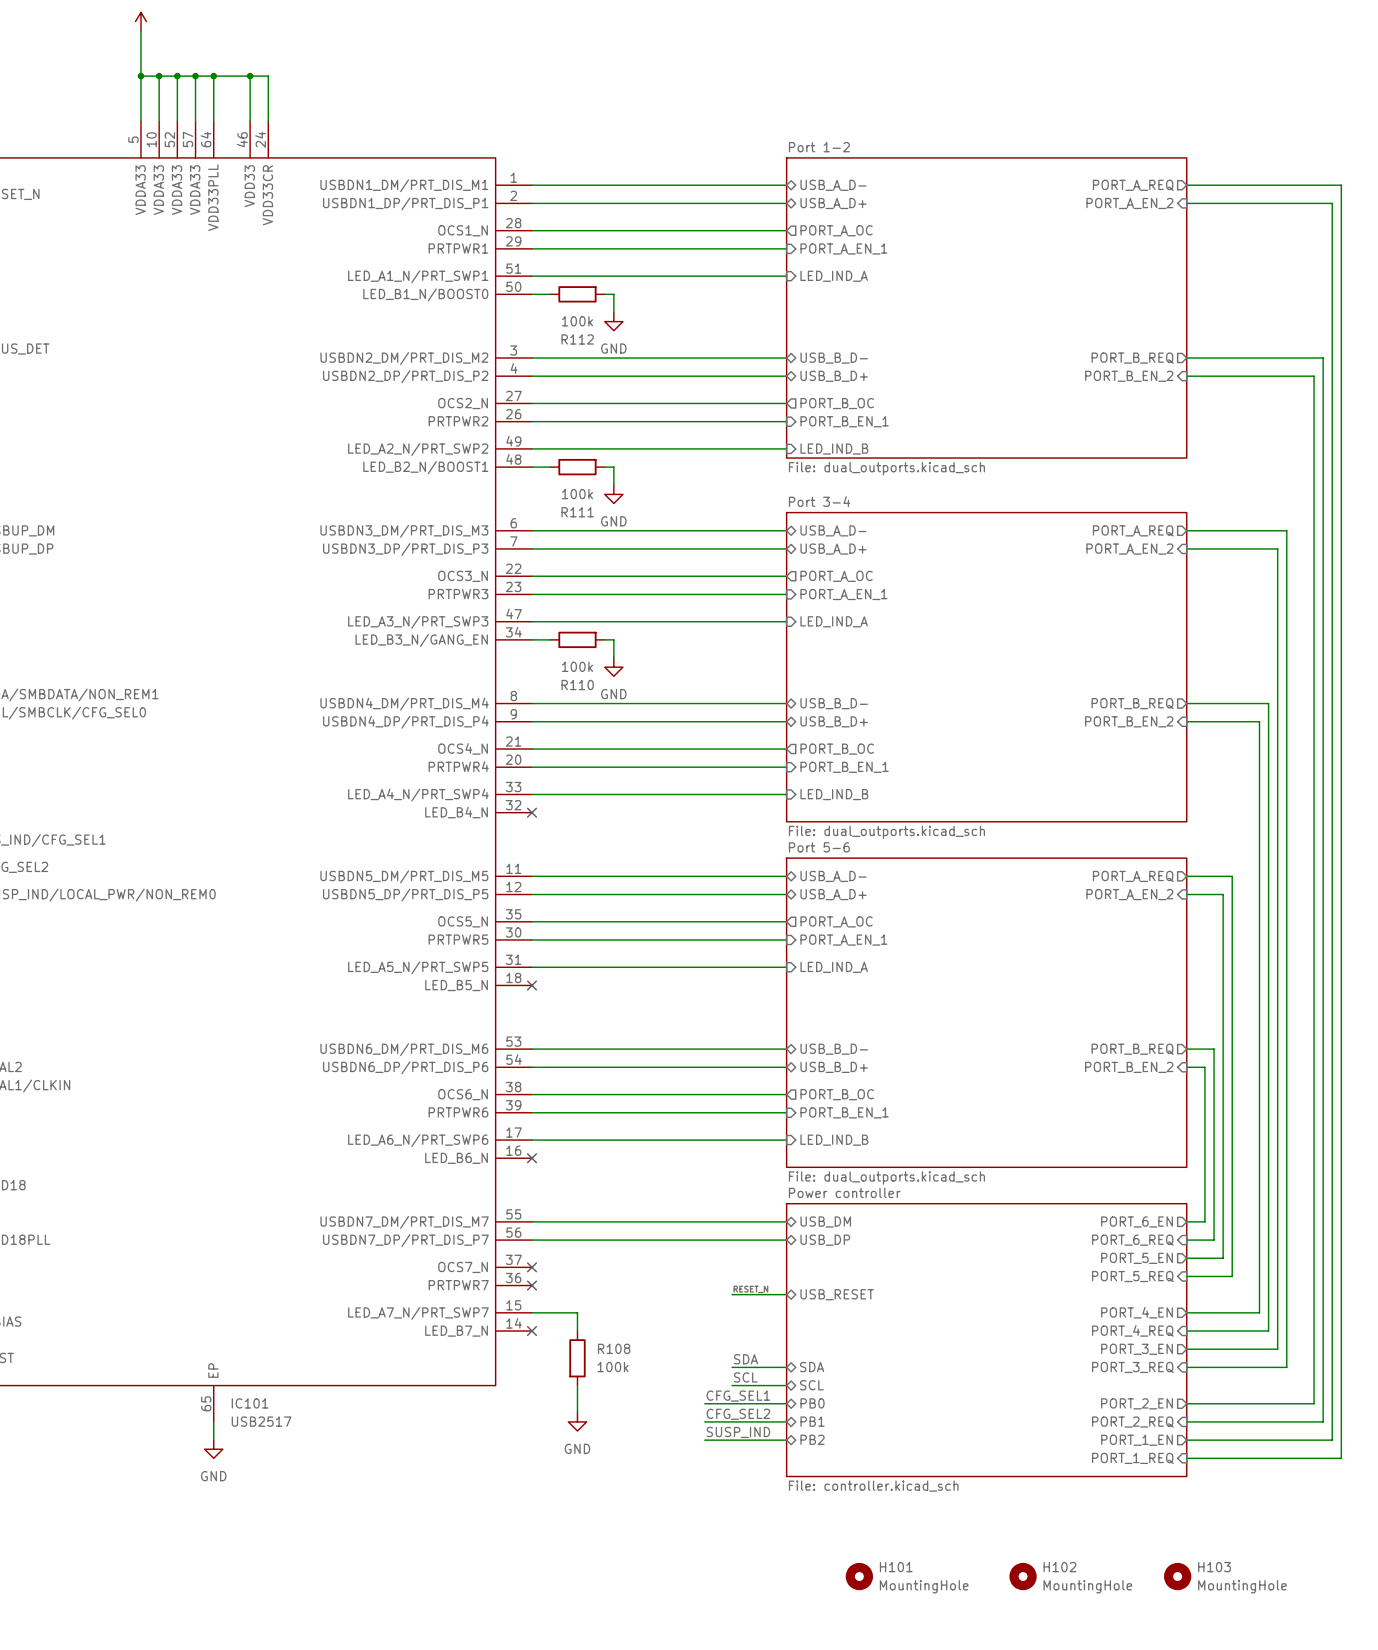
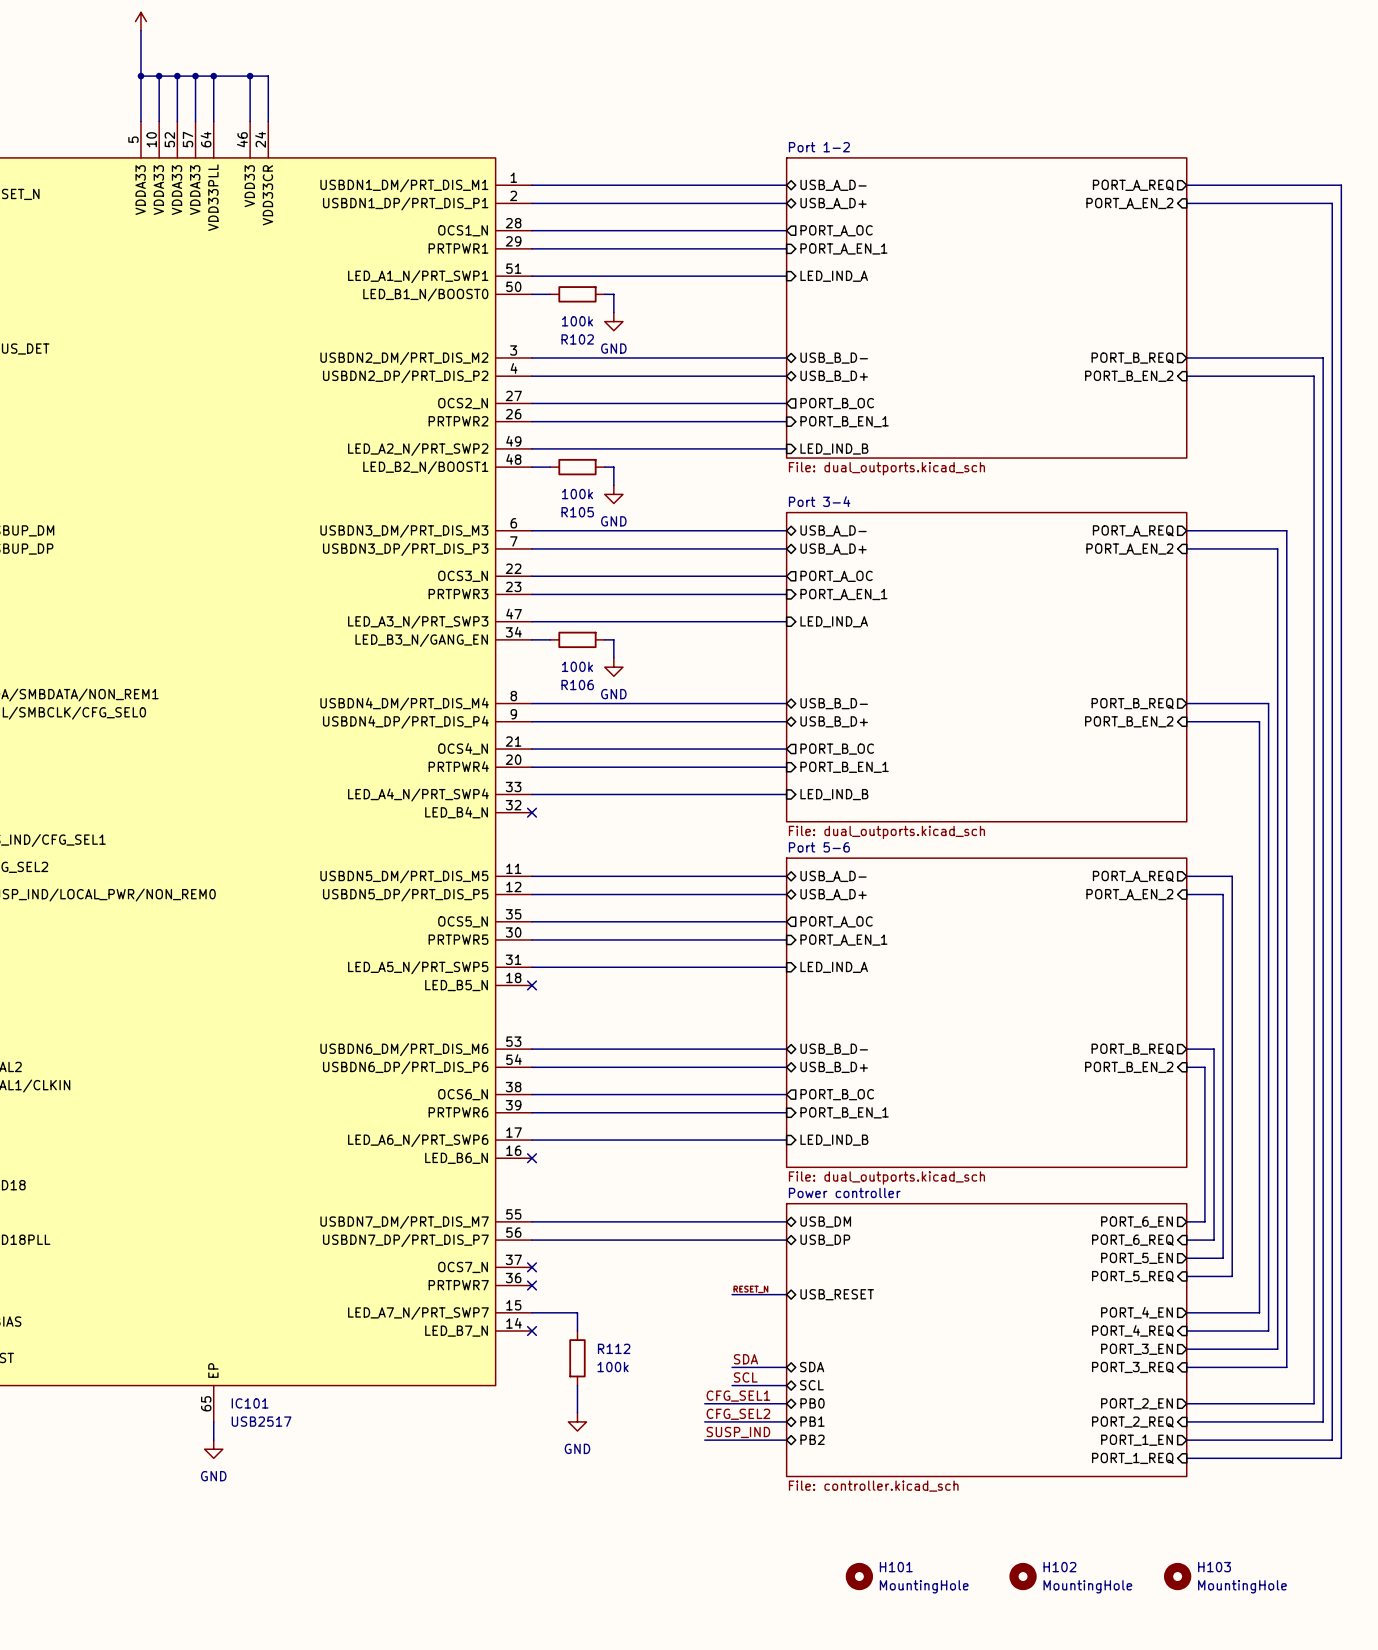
R112 name: R112 (577, 339) -> R102 (577, 339)
R111 name: R111 (577, 512) -> R105 (577, 512)
R110 name: R110 (577, 685) -> R106 (577, 685)
R108 name: R108 (614, 1348) -> R112 (614, 1348)

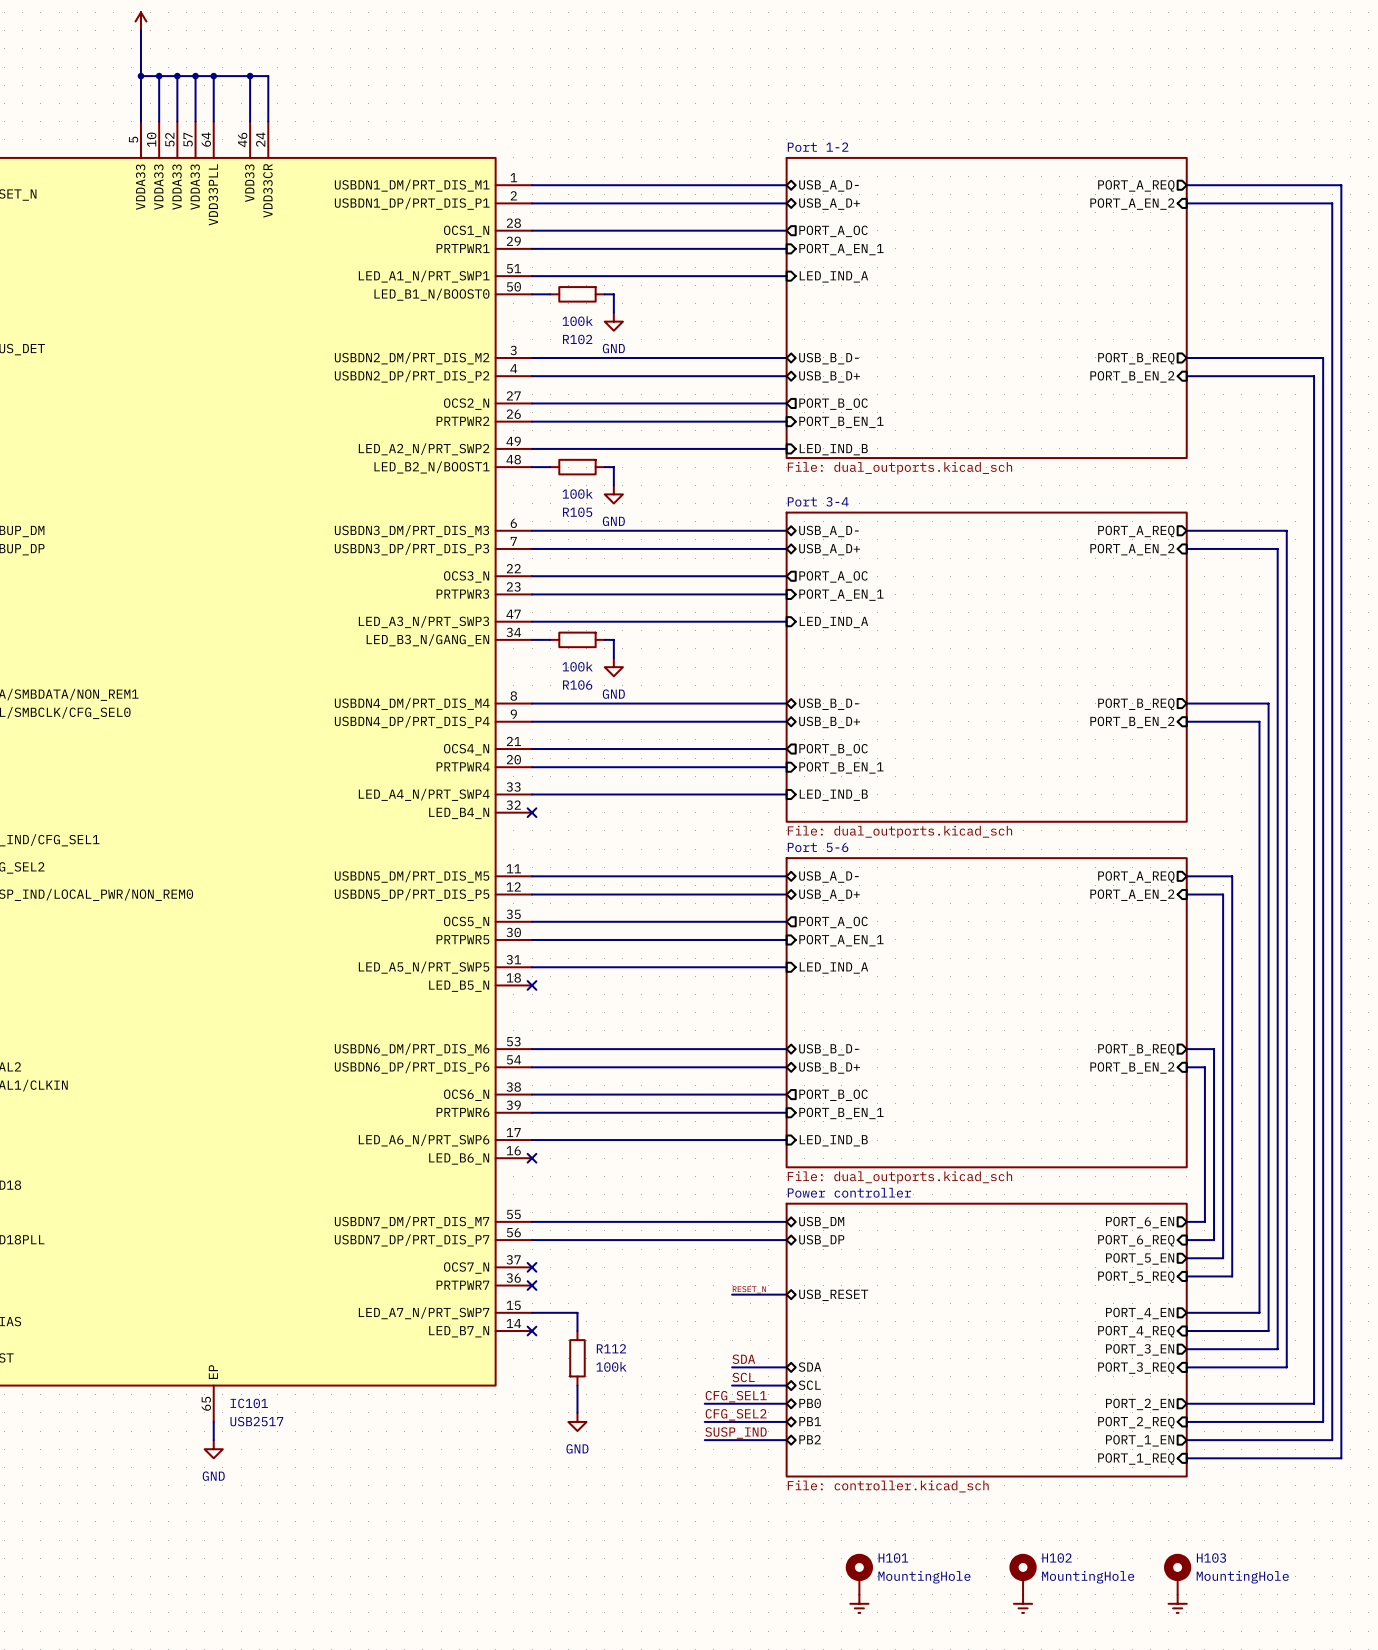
H101 symbol: [845, 1562, 874, 1591] -> [845, 1553, 874, 1595]
H102 symbol: [1009, 1562, 1037, 1591] -> [1009, 1553, 1037, 1595]
H103 symbol: [1164, 1562, 1192, 1591] -> [1164, 1553, 1192, 1595]
power symbol: none -> (859, 1603)
power symbol: none -> (1023, 1603)
power symbol: none -> (1177, 1603)

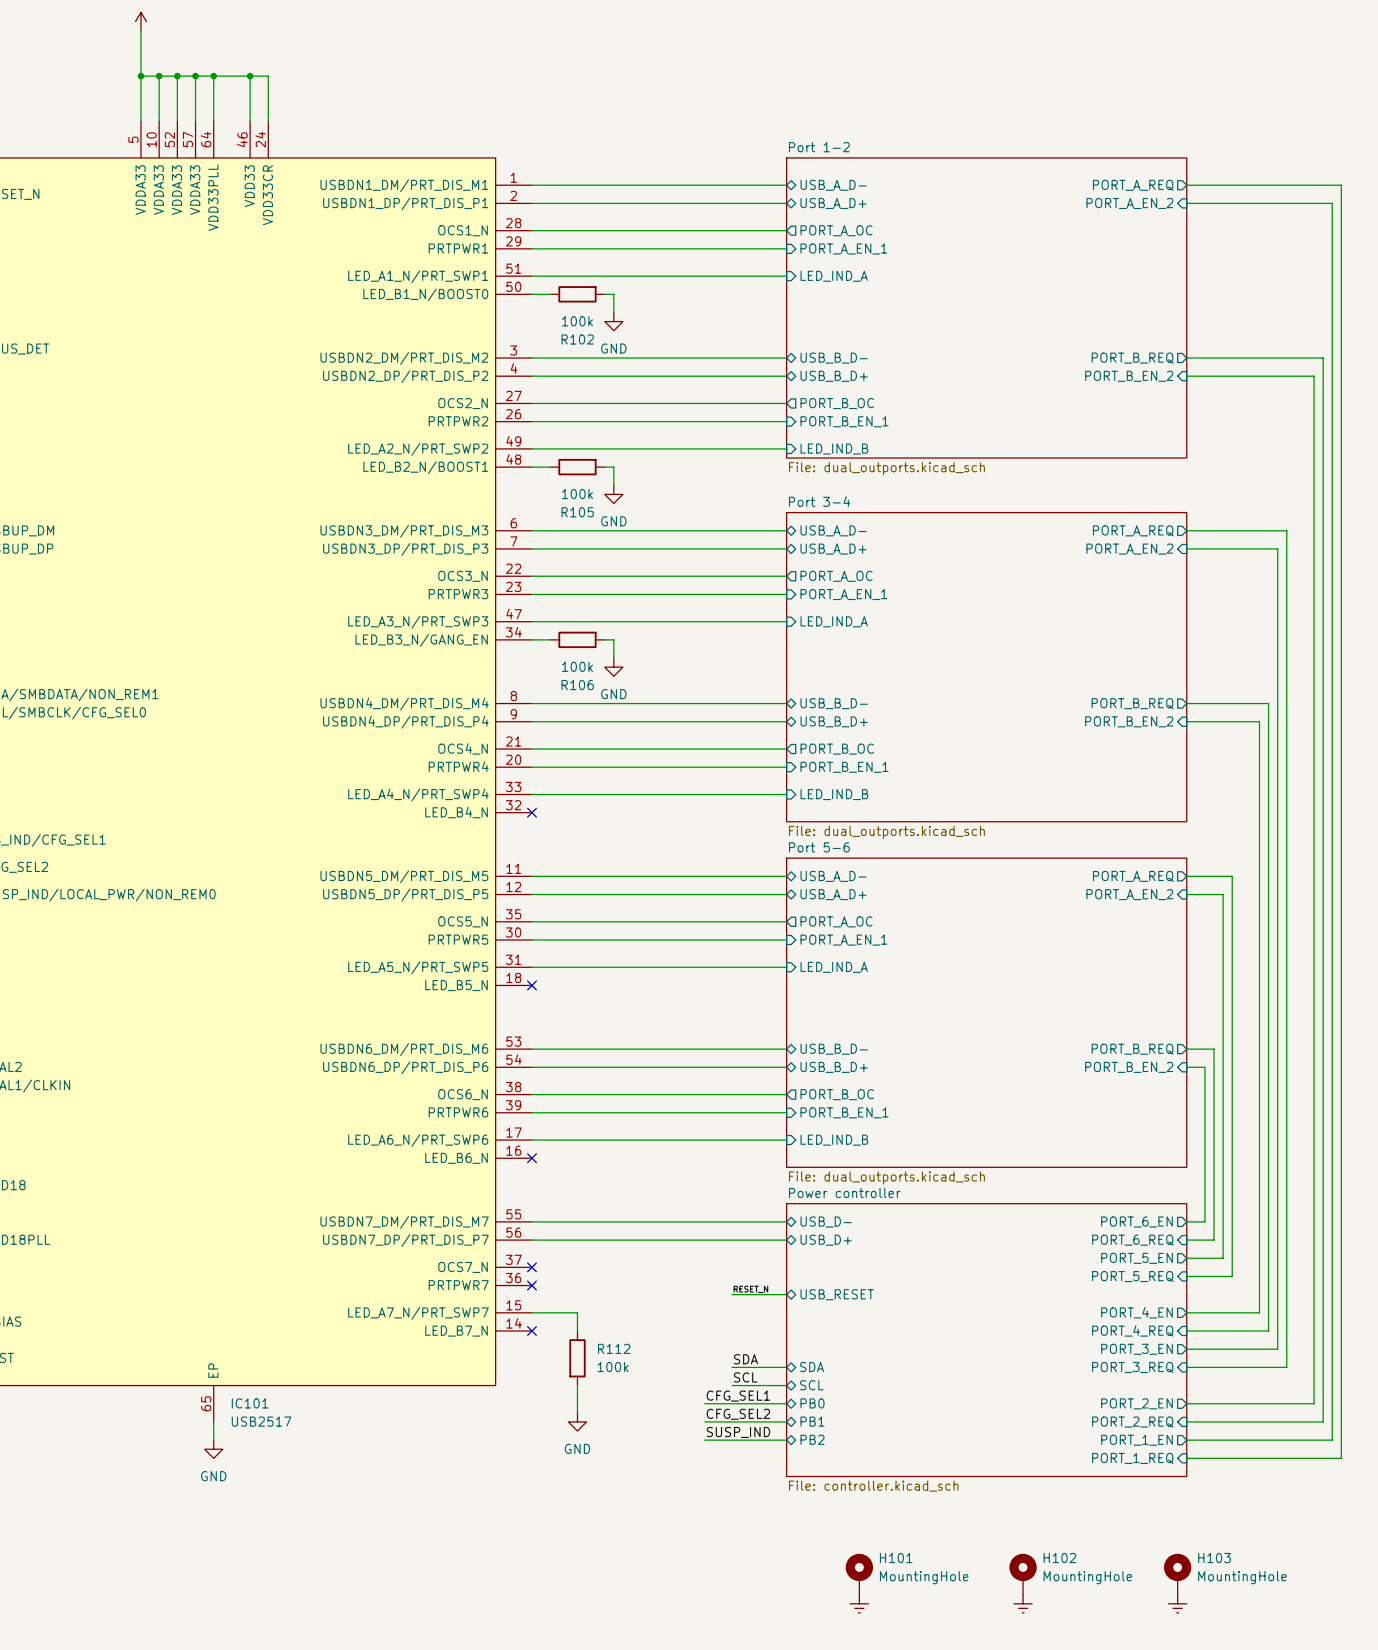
sheet pin: USB_DM (821, 1222) -> USB_D- (826, 1221)
sheet pin: USB_DP (821, 1240) -> USB_D+ (826, 1240)

